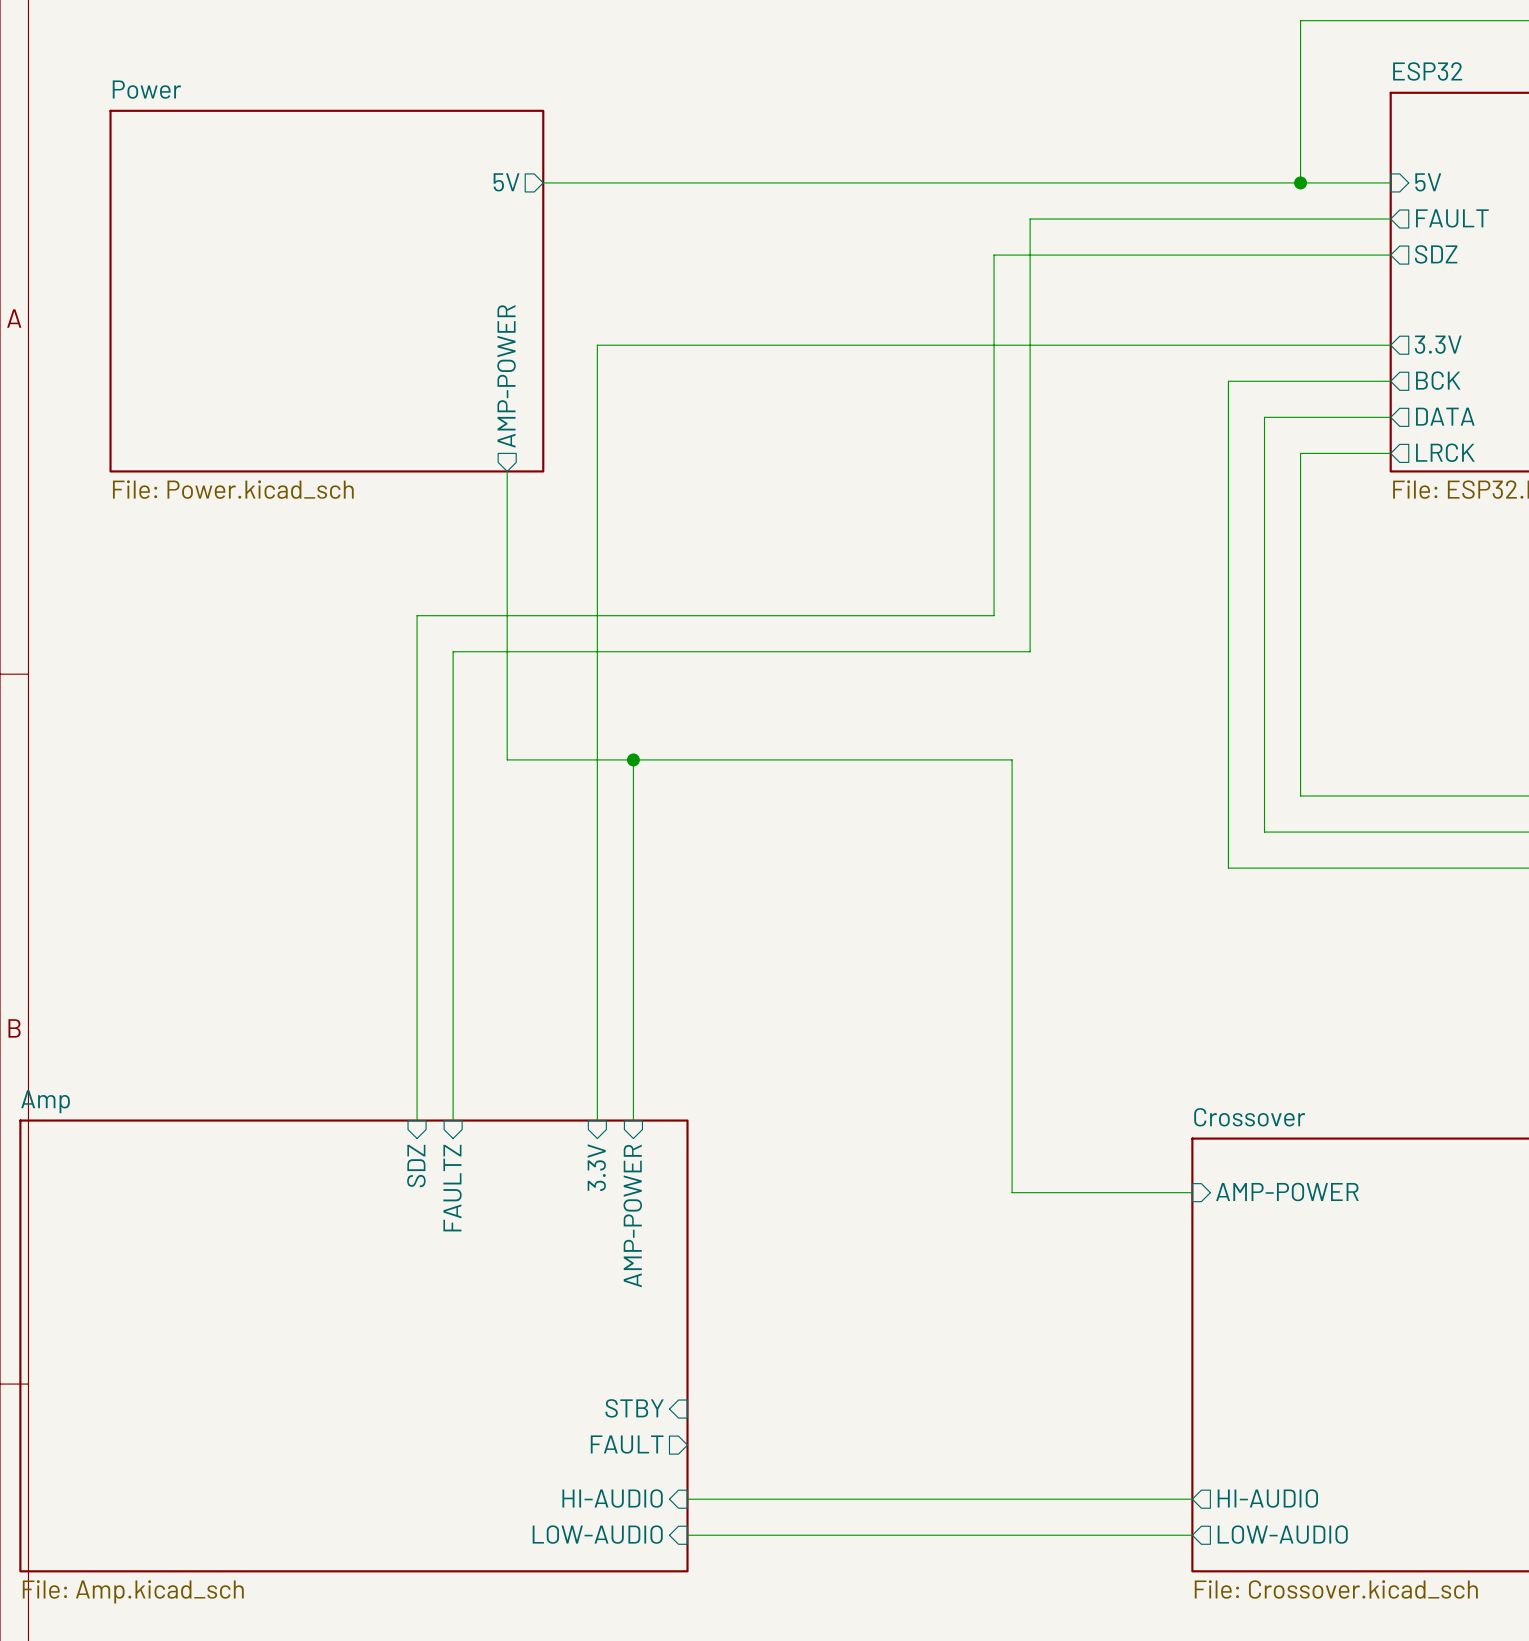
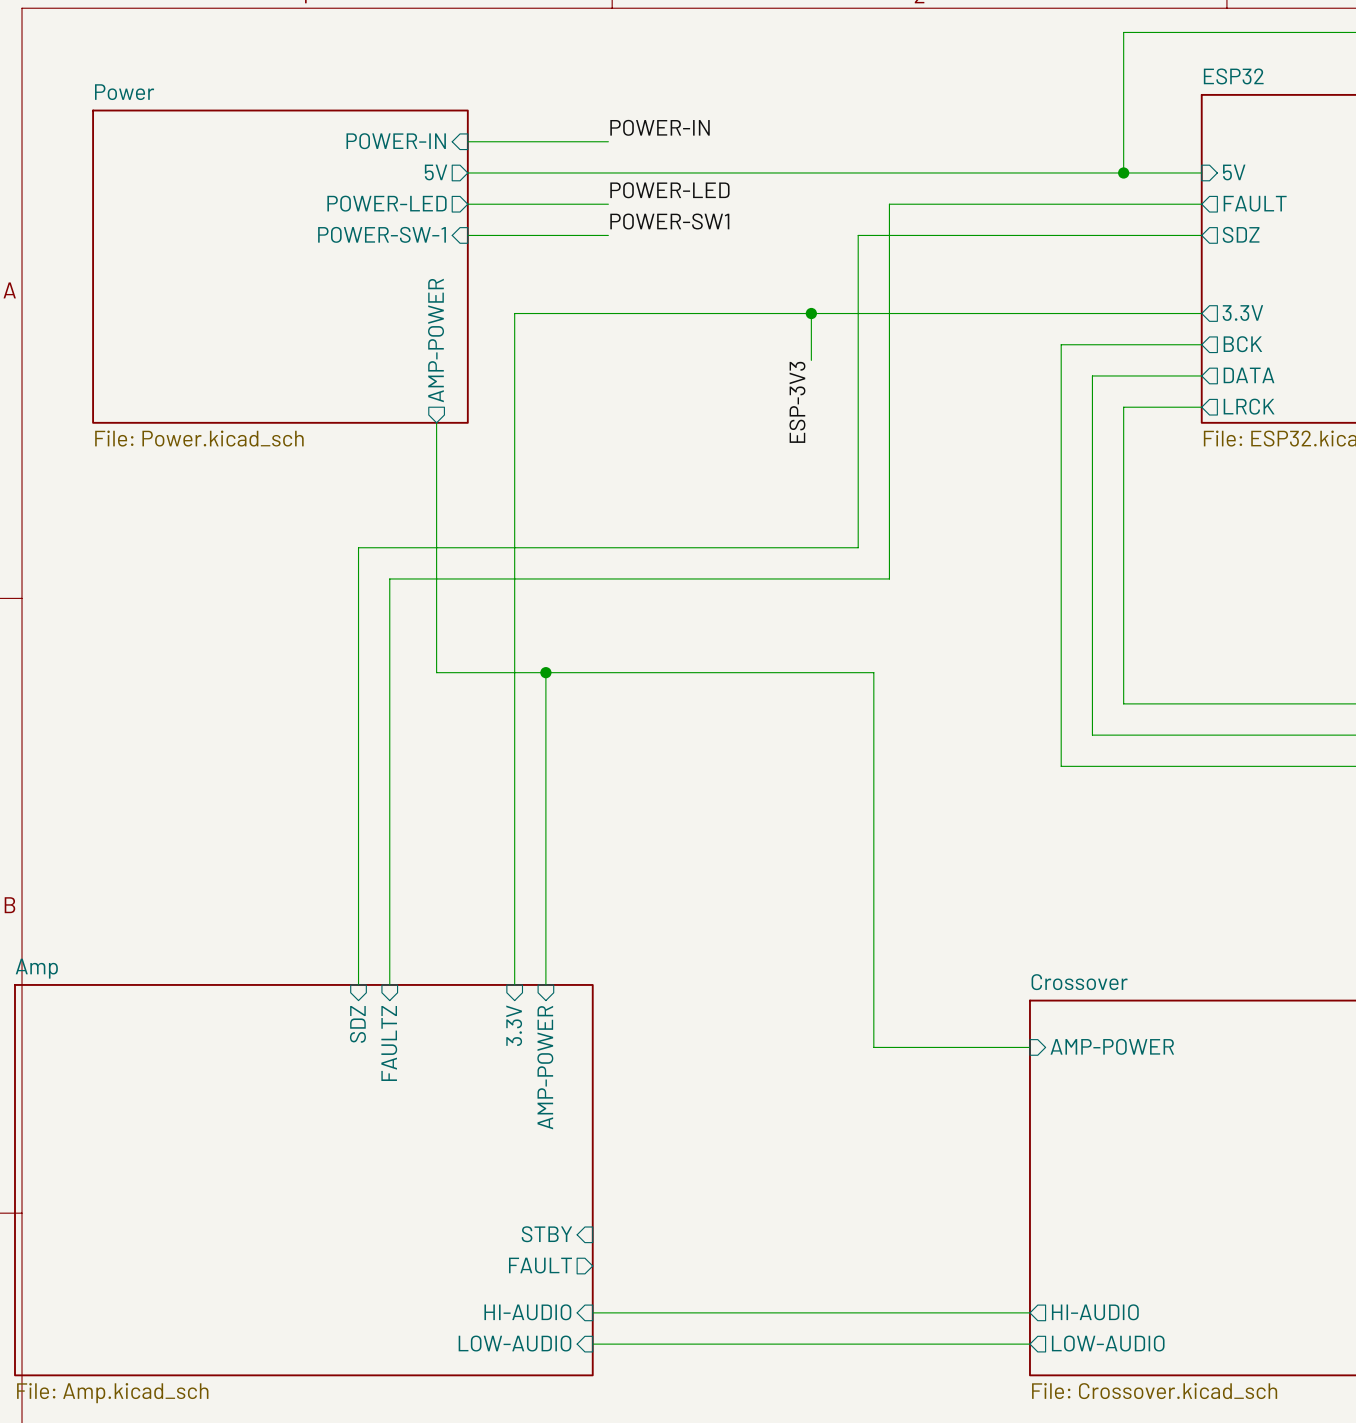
label: none -> POWER-IN (660, 127)
sheet pin: none -> POWER-IN (396, 141)
wire: none -> (467, 141) (608, 141)
label: none -> POWER-LED (669, 190)
sheet pin: none -> POWER-LED (387, 203)
wire: none -> (467, 204) (608, 204)
label: none -> POWER-SW1 (669, 221)
sheet pin: none -> POWER-SW-1 (382, 234)
wire: none -> (467, 235) (608, 235)
wire: none -> (811, 313) (811, 360)
junction: none -> (811, 313)
label: none -> ESP-3V3 (797, 402)

